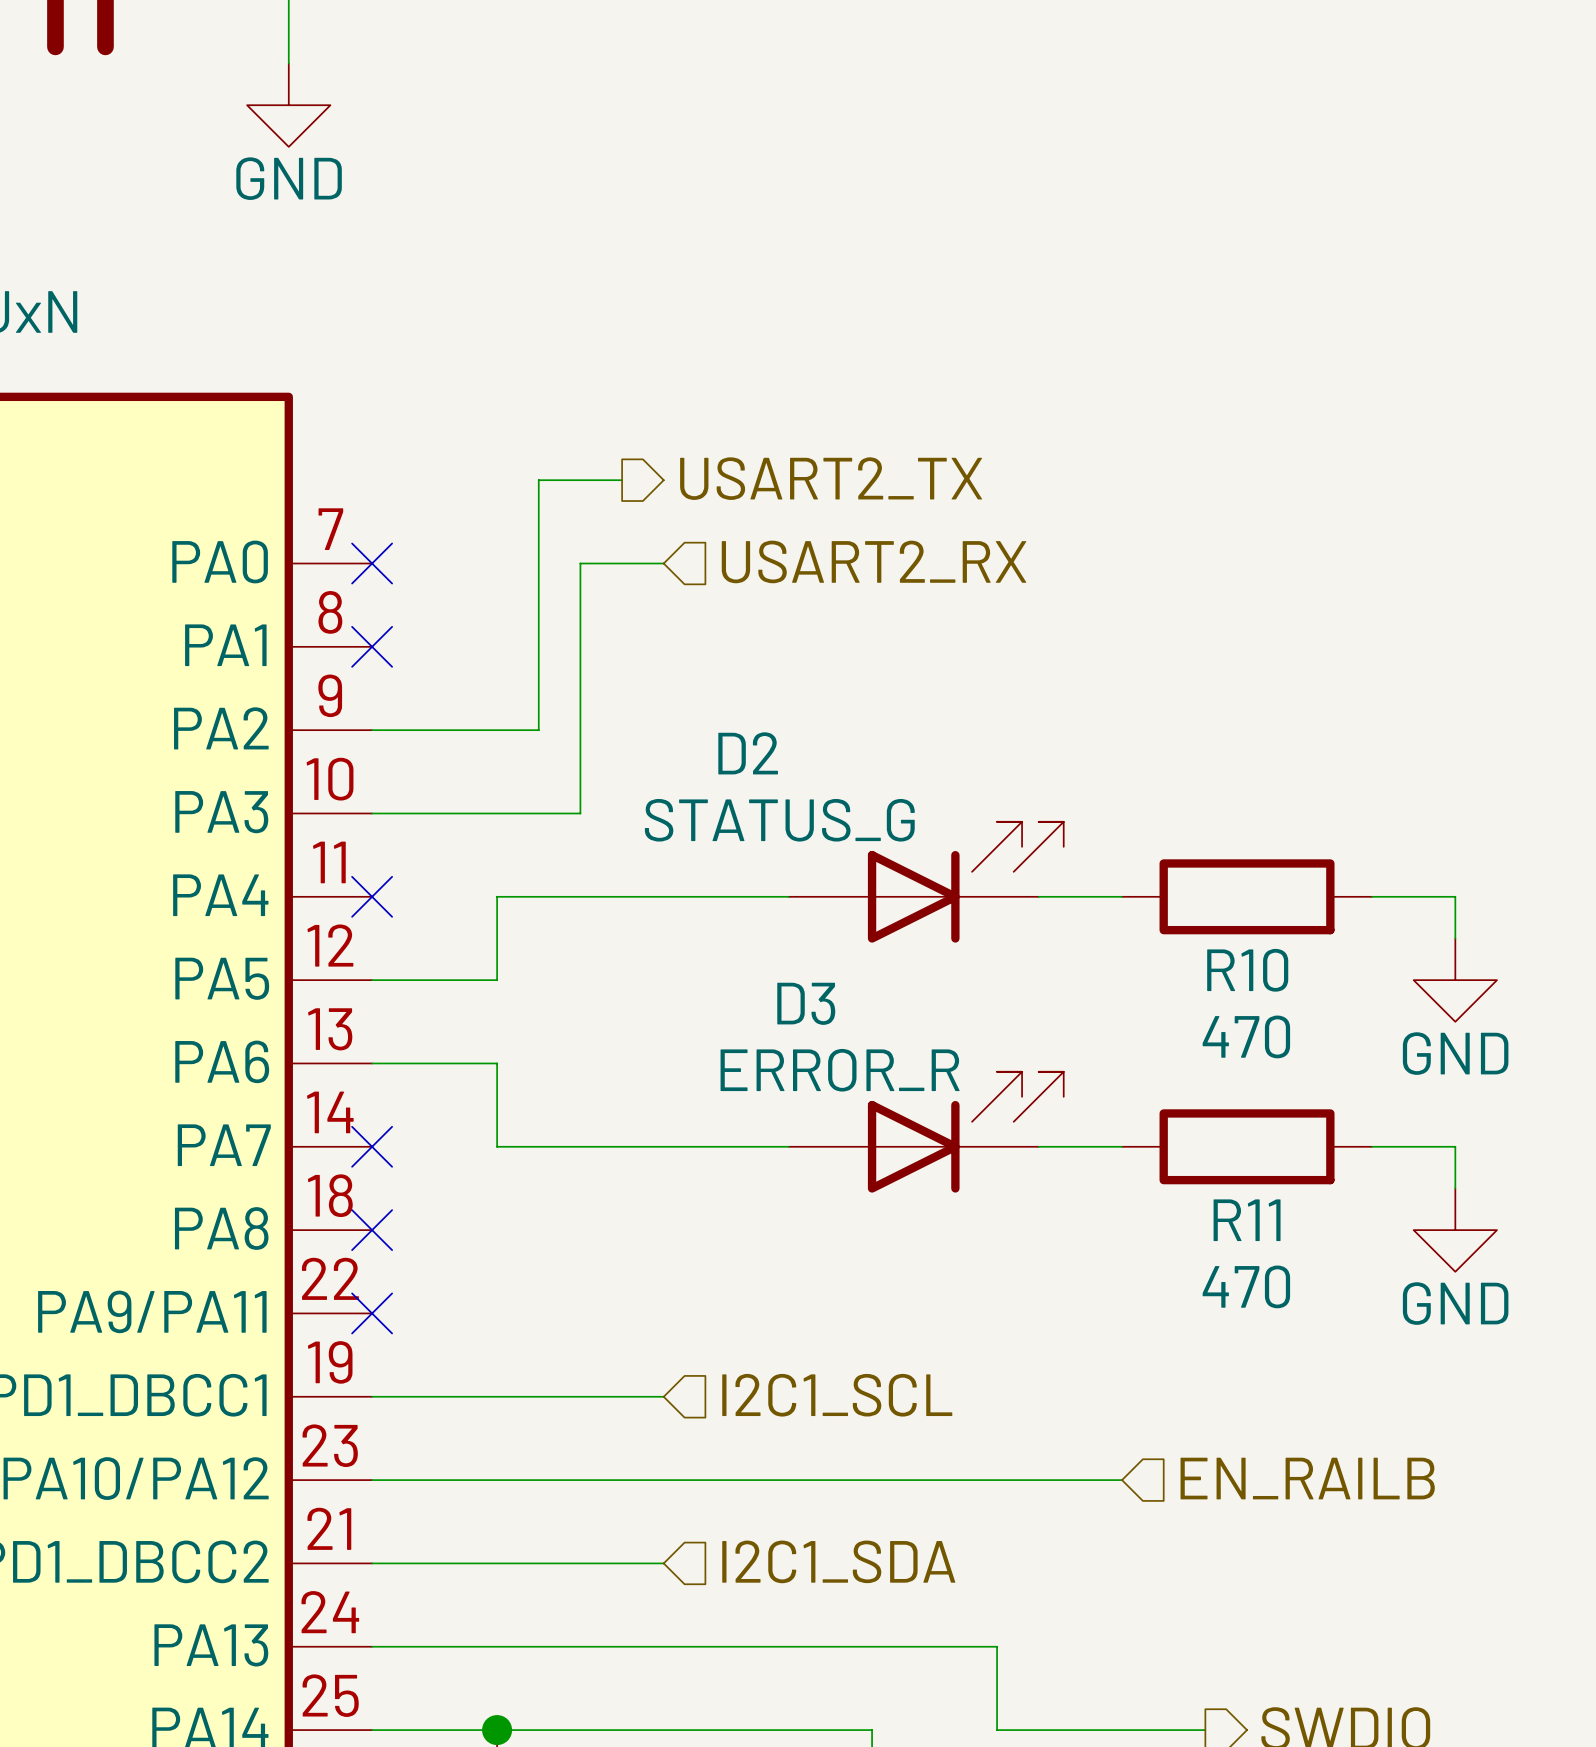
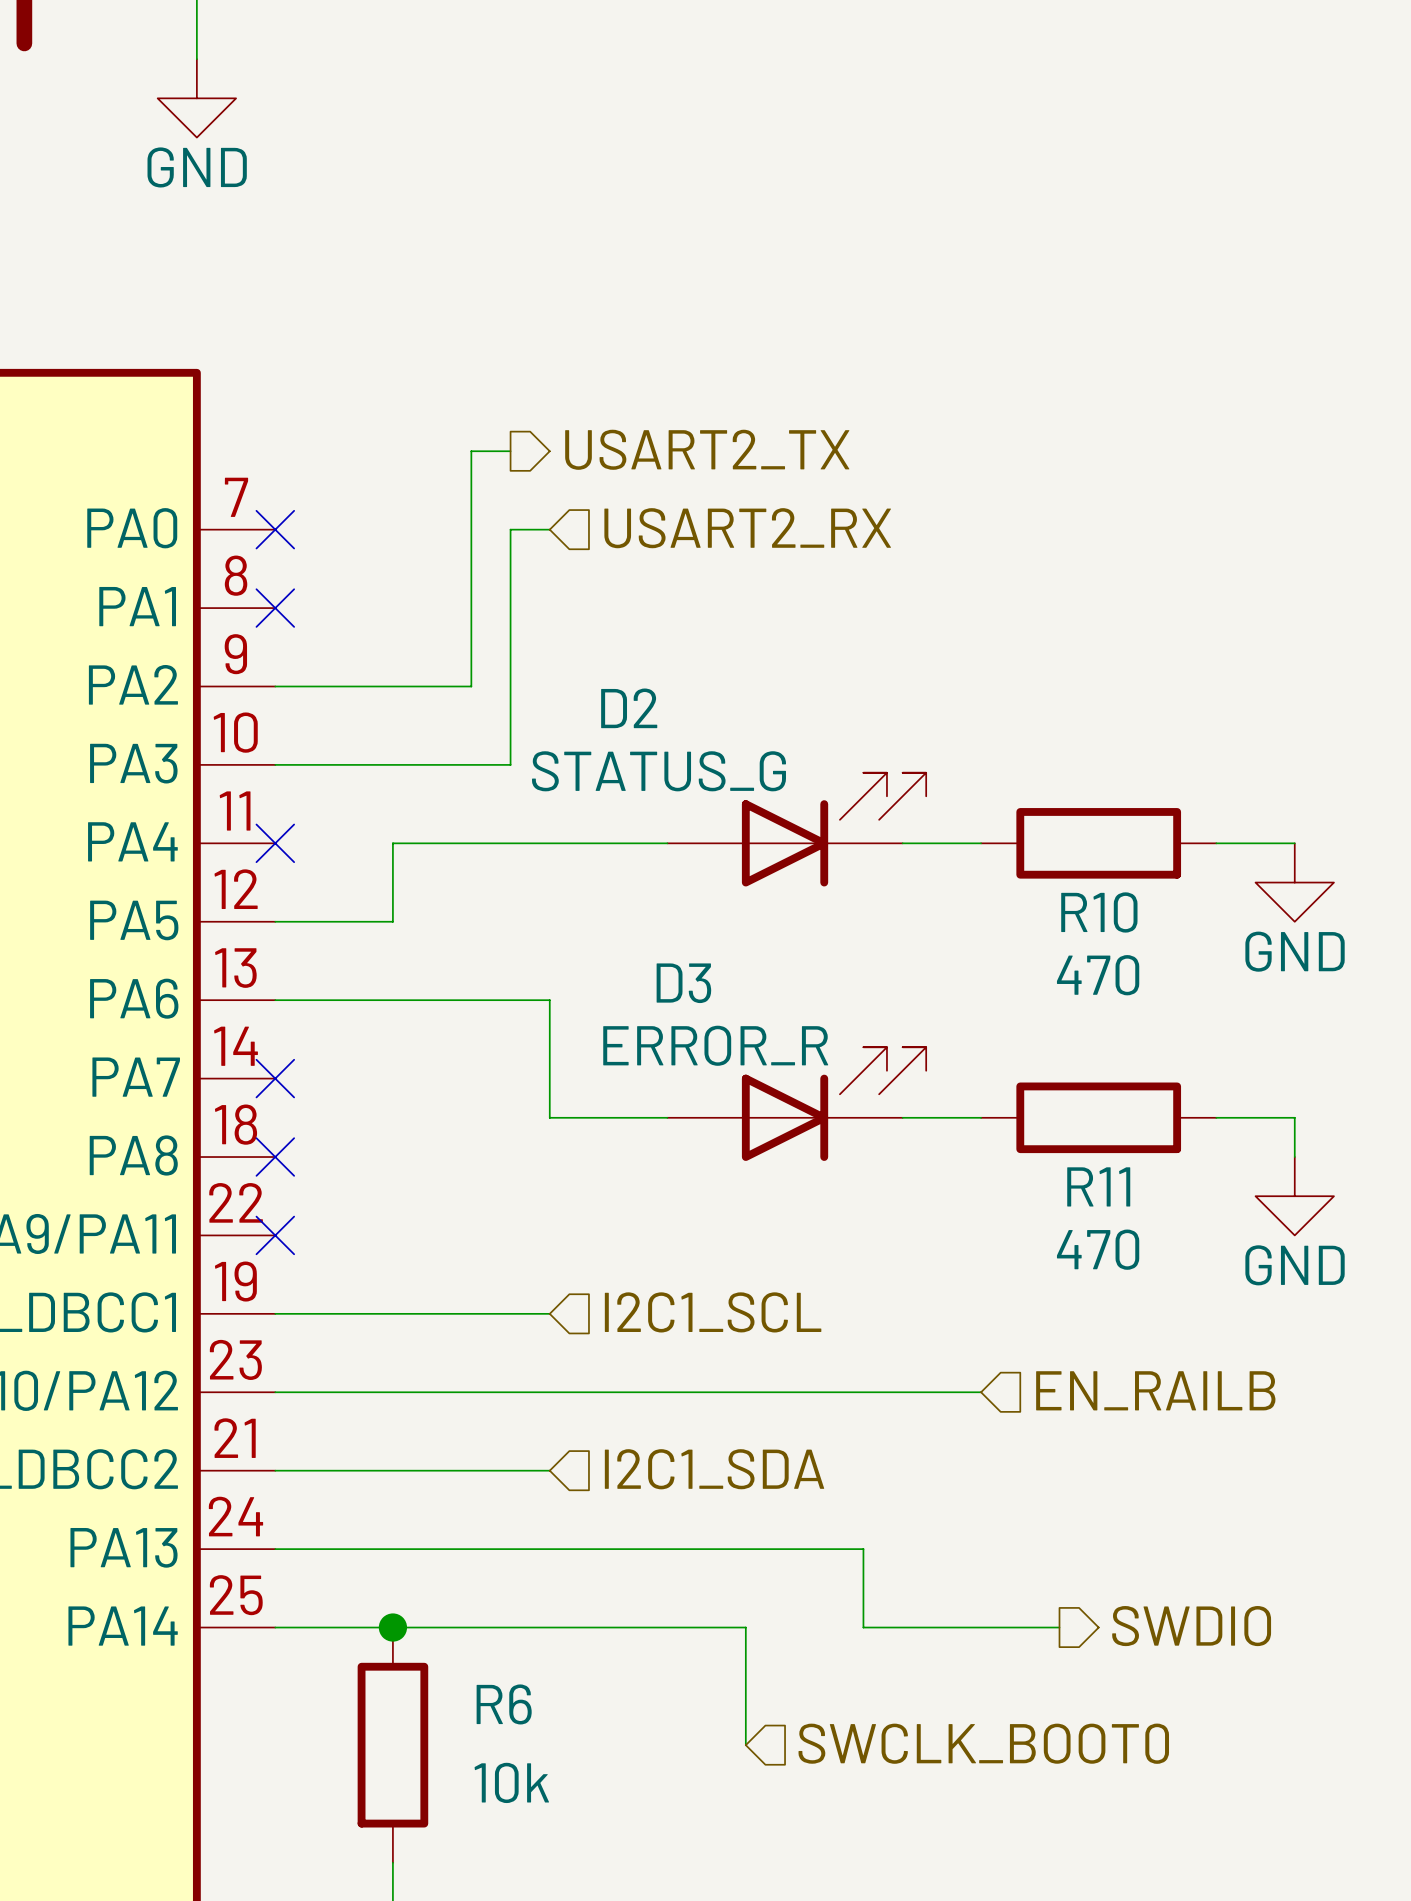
wire: (580, 480) (538, 480) (538, 730) -> none
wire: (580, 563) (622, 563) -> (471, 529) (471, 451)
wire: none -> (510, 529) (510, 764) (471, 764)
wire: (580, 730) (580, 813) -> (471, 686) (432, 686)
power symbol position: GND (1455, 980) -> GND (1294, 882)
wire: (497, 1063) (497, 1146) (788, 1146) -> (392, 1000) (549, 1000) (549, 1117) (667, 1117)
D3 position: (926, 1132) -> (796, 1104)
wire: (1038, 1146) (1122, 1146) -> (902, 1117) (981, 1117)
R11 position: (1247, 1146) -> (1098, 1117)
wire: (1372, 1146) (1455, 1146) (1455, 1188) -> (1216, 1117) (1294, 1117) (1294, 1157)
power symbol position: GND (1455, 1230) -> GND (1294, 1196)

